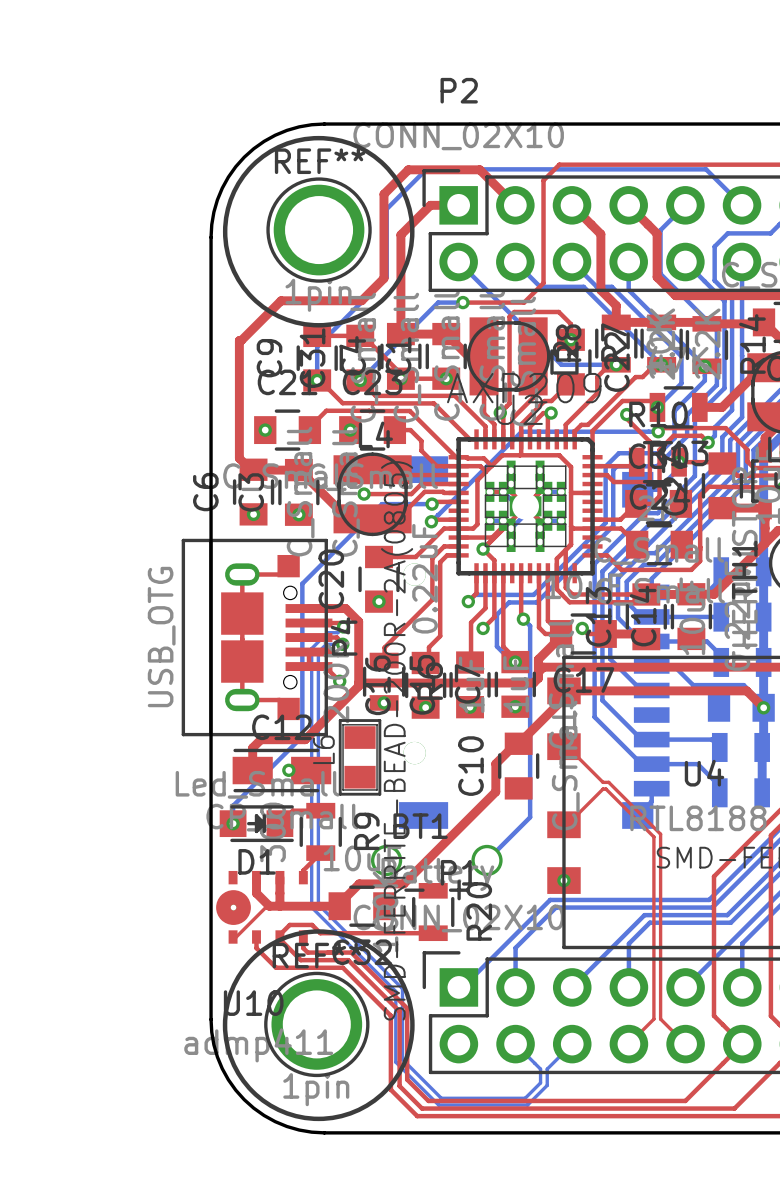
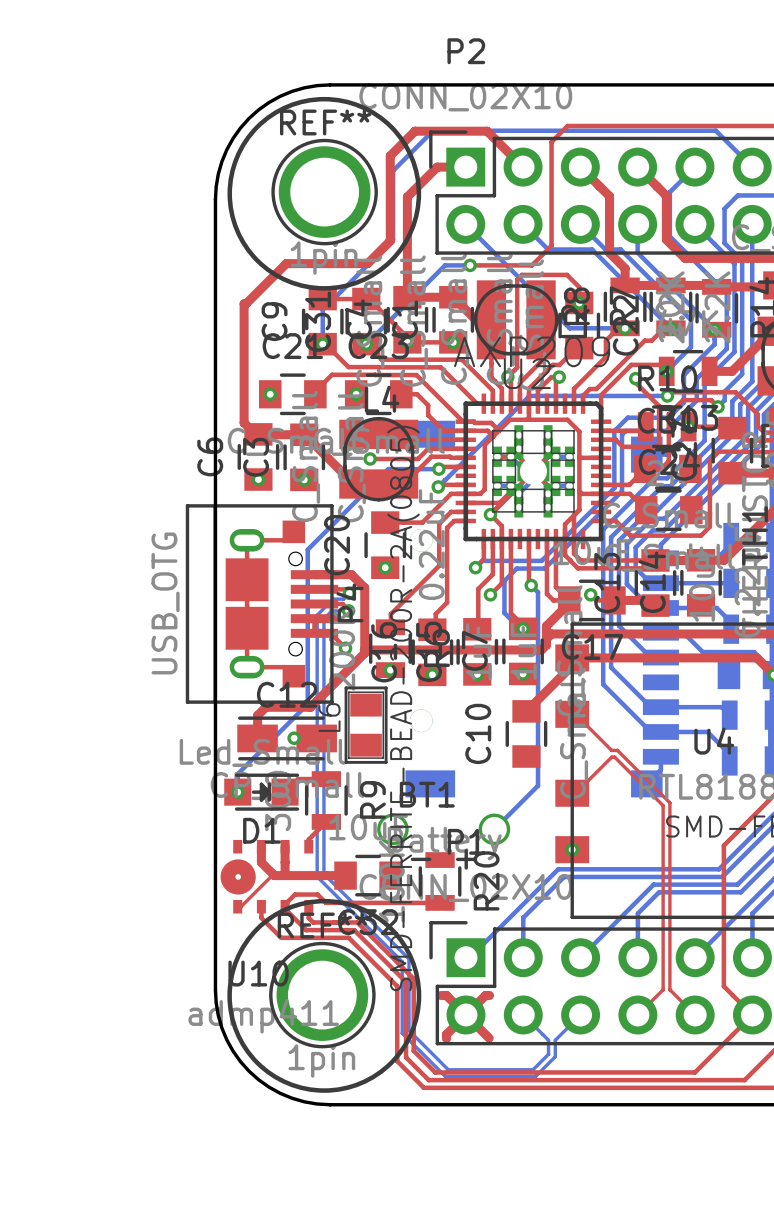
top track: (518, 743) (515, 743) (495, 763) (495, 791) (403, 883) (359, 883) (339, 903) (339, 906) -> none
top track: none -> (441, 995) (446, 995) (489, 1038)
top track: none -> (489, 995) (485, 995) (446, 1034) (446, 1038)

